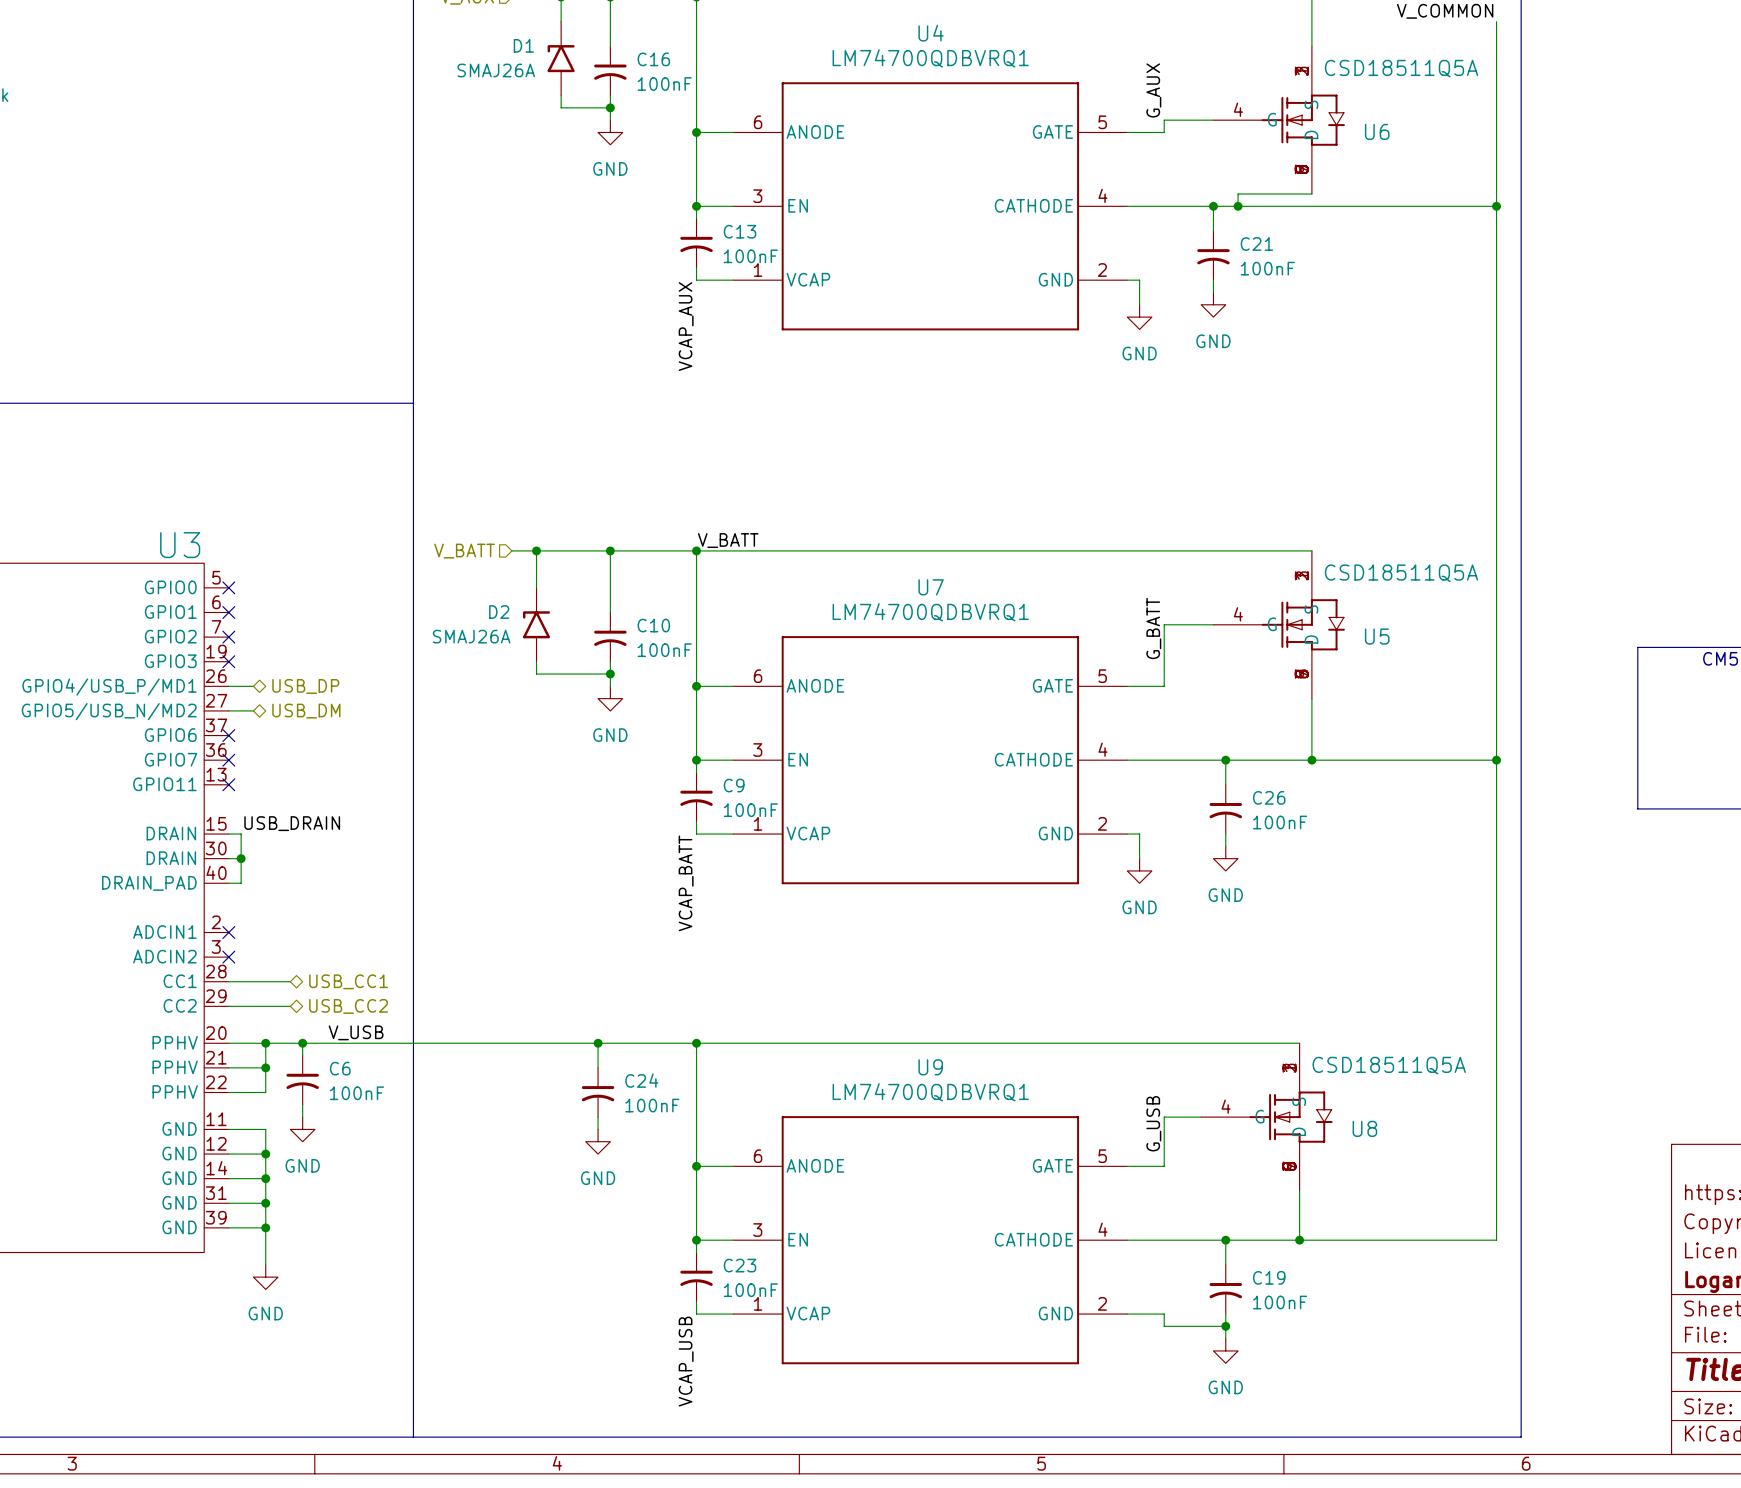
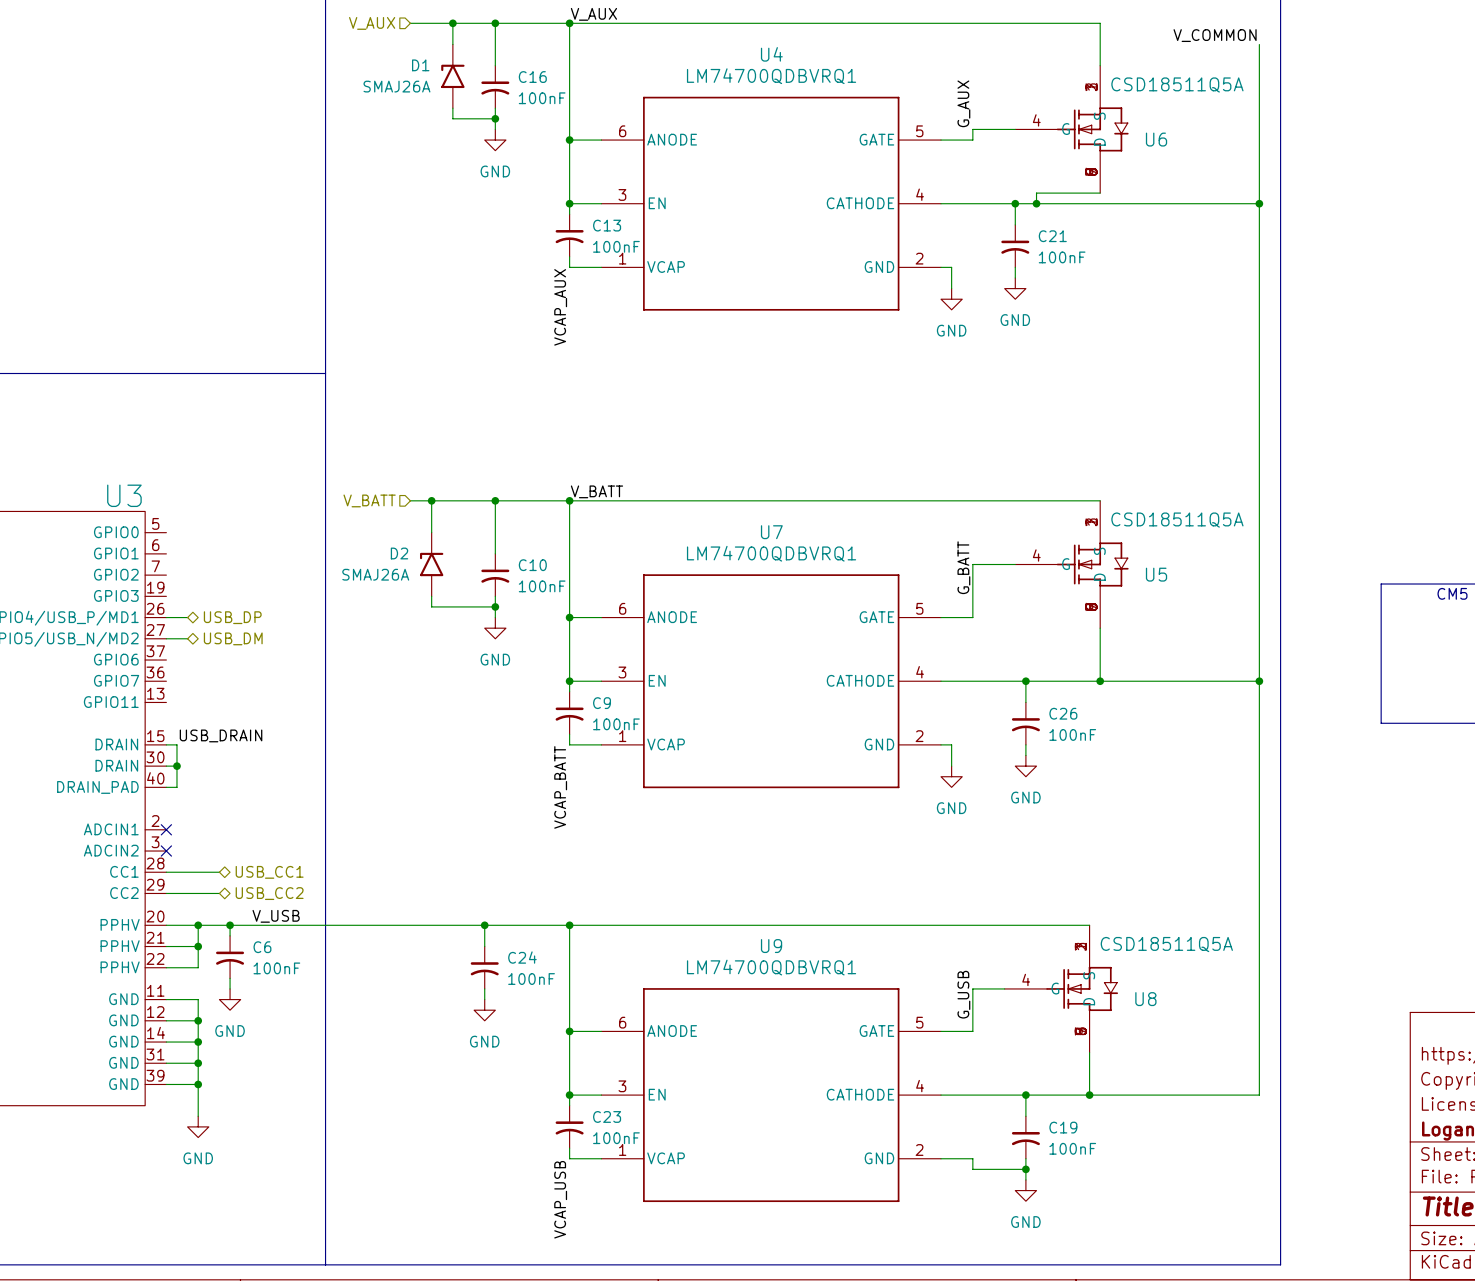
no-connect mark: (228, 587) -> none
no-connect mark: (228, 612) -> none
no-connect mark: (228, 637) -> none
no-connect mark: (228, 661) -> none
no-connect mark: (228, 735) -> none
no-connect mark: (228, 760) -> none
no-connect mark: (228, 784) -> none

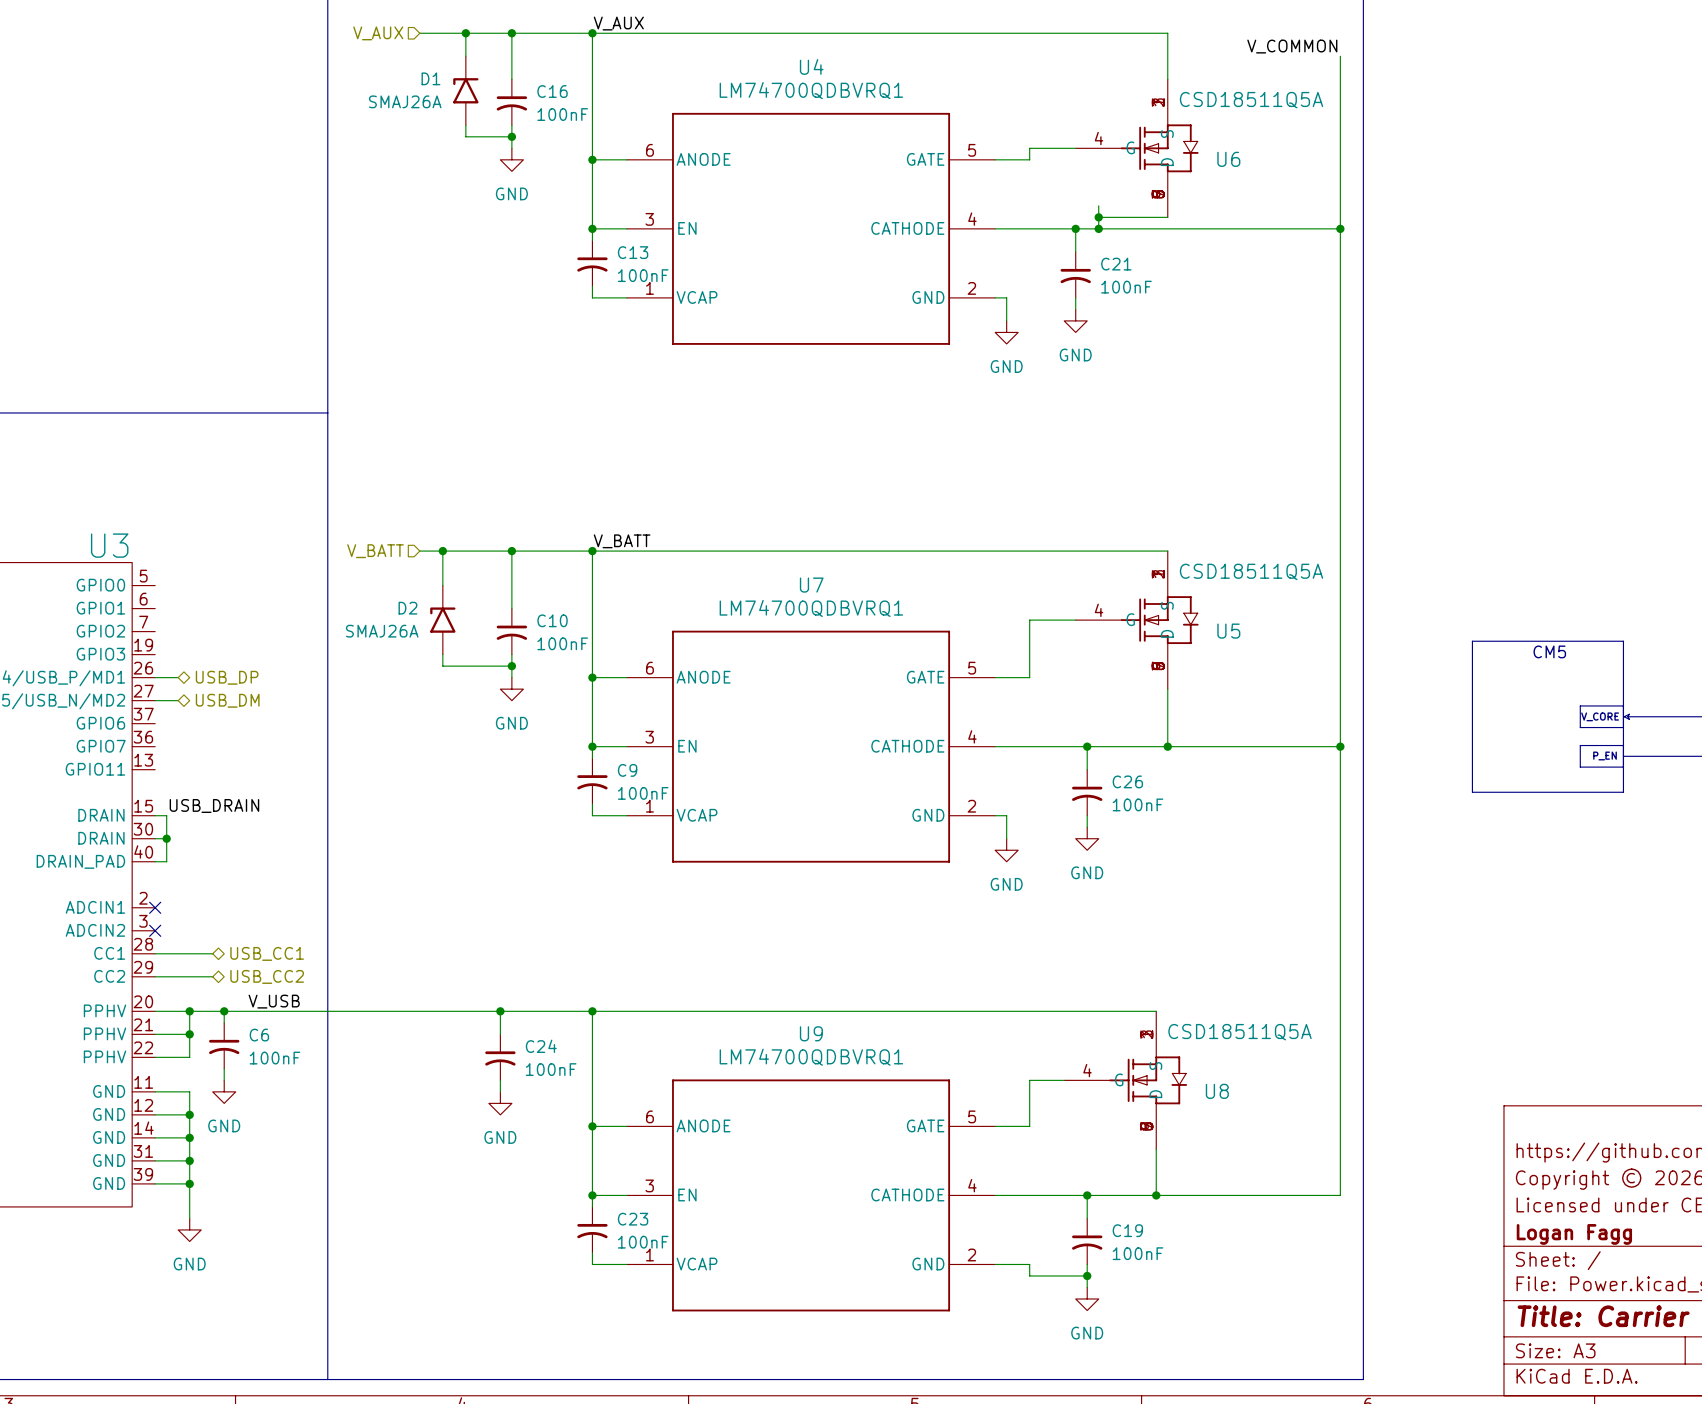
label: G_AUX (963, 103) -> none
wire: none -> (1098, 205) (1098, 217)
junction: none -> (1098, 217)
label: VCAP_AUX (560, 307) -> none
label: G_BATT (963, 567) -> none
label: VCAP_BATT (560, 787) -> none
label: G_USB (963, 994) -> none
label: VCAP_USB (560, 1199) -> none

